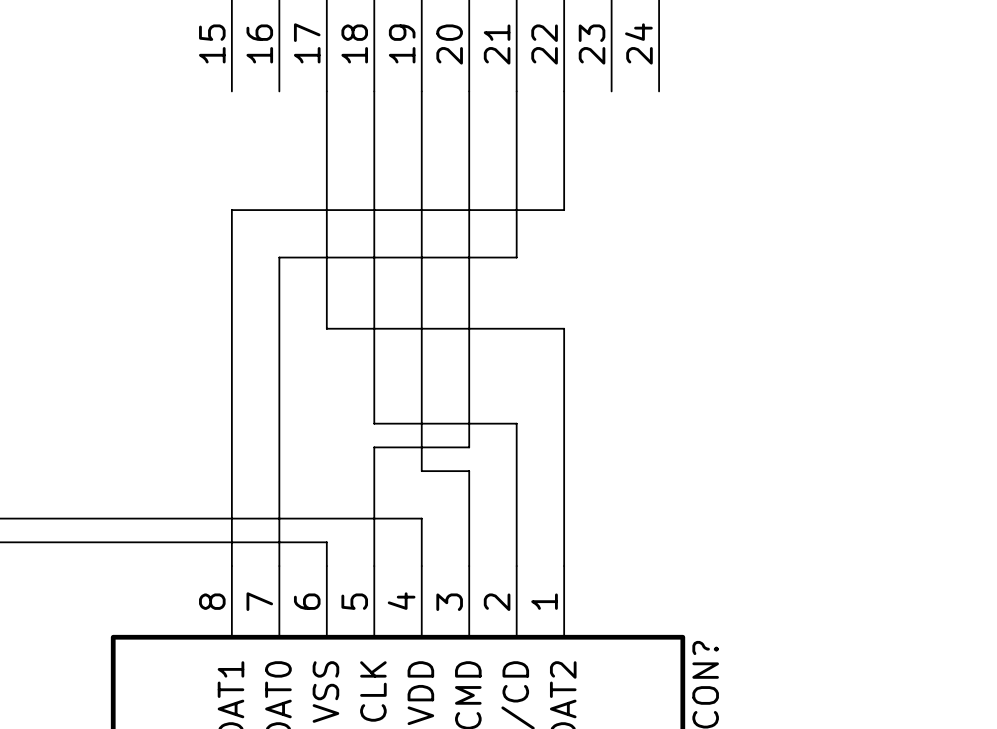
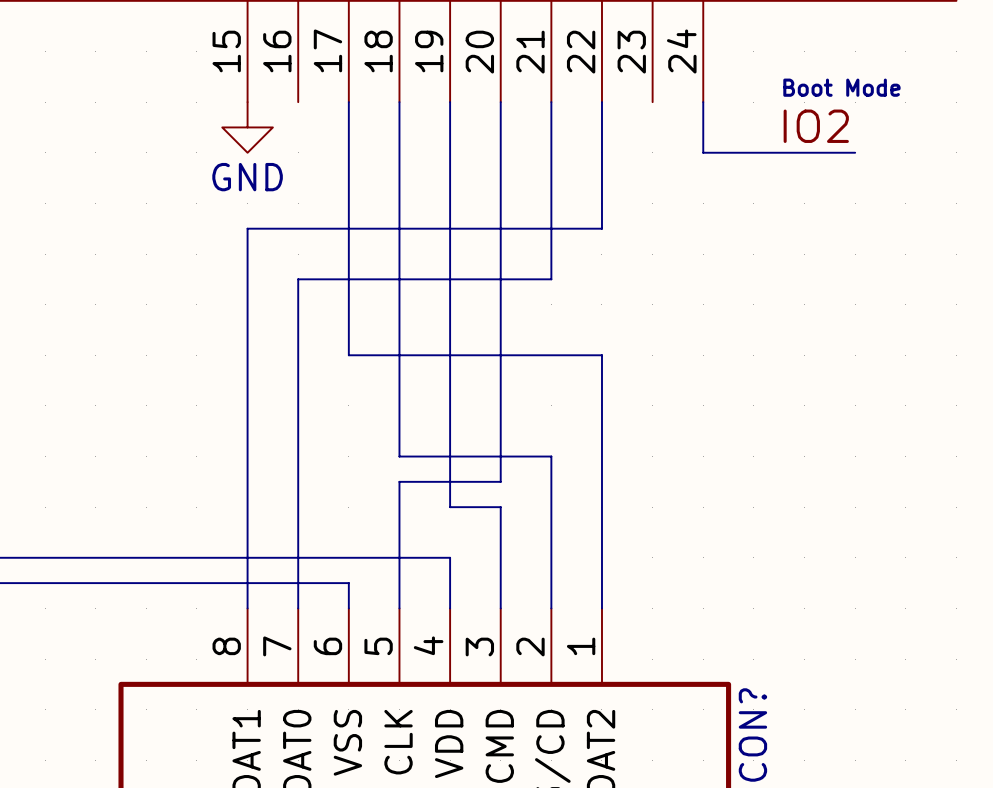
text: none -> Boot Mode (841, 87)
wire: none -> (703, 102) (703, 152) (855, 152)
label: none -> IO2 (816, 126)
power symbol: none -> GND (247, 127)

